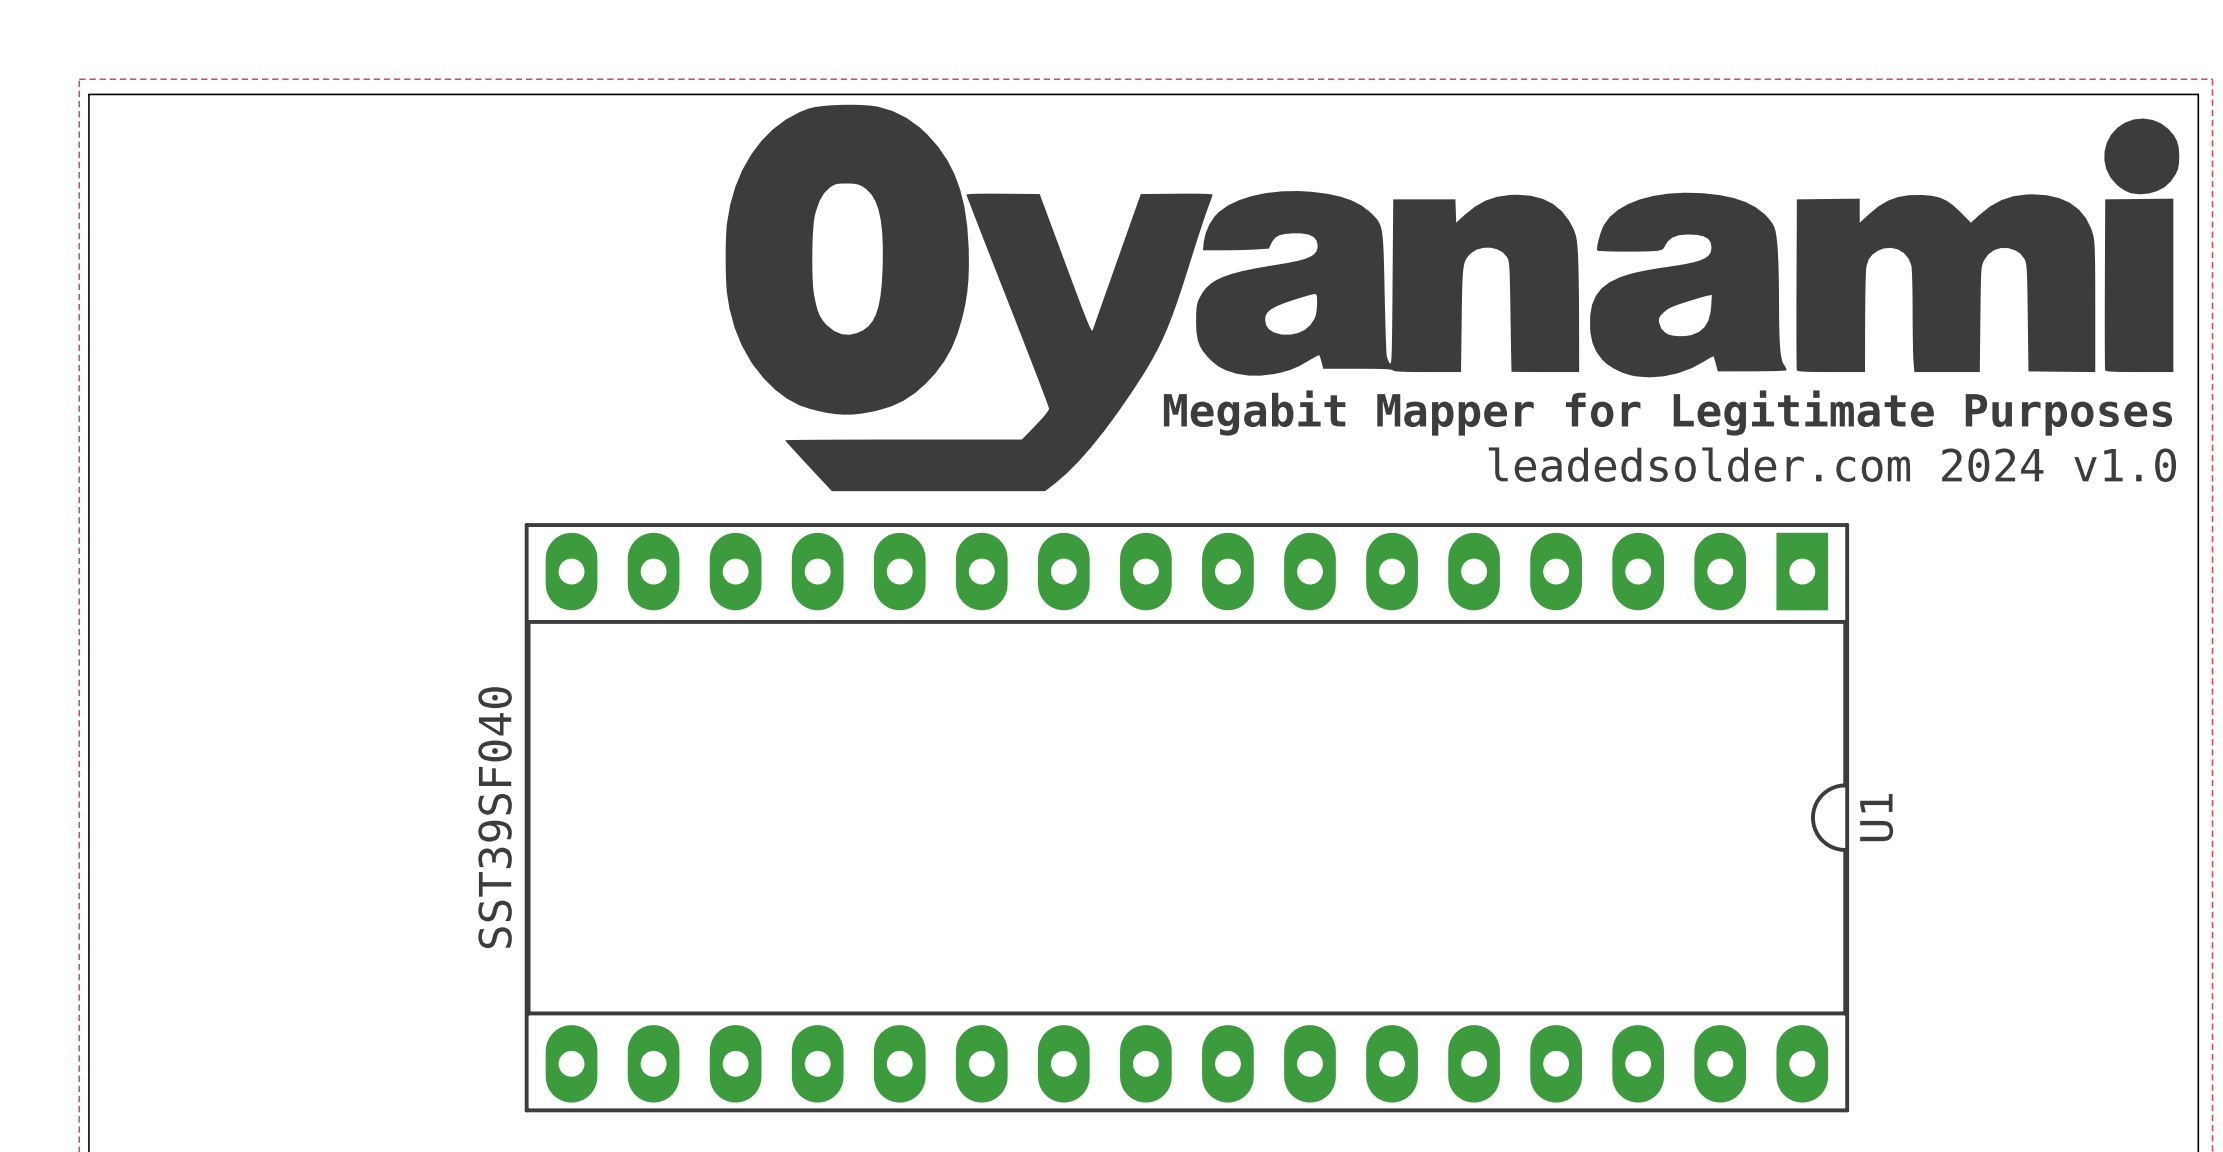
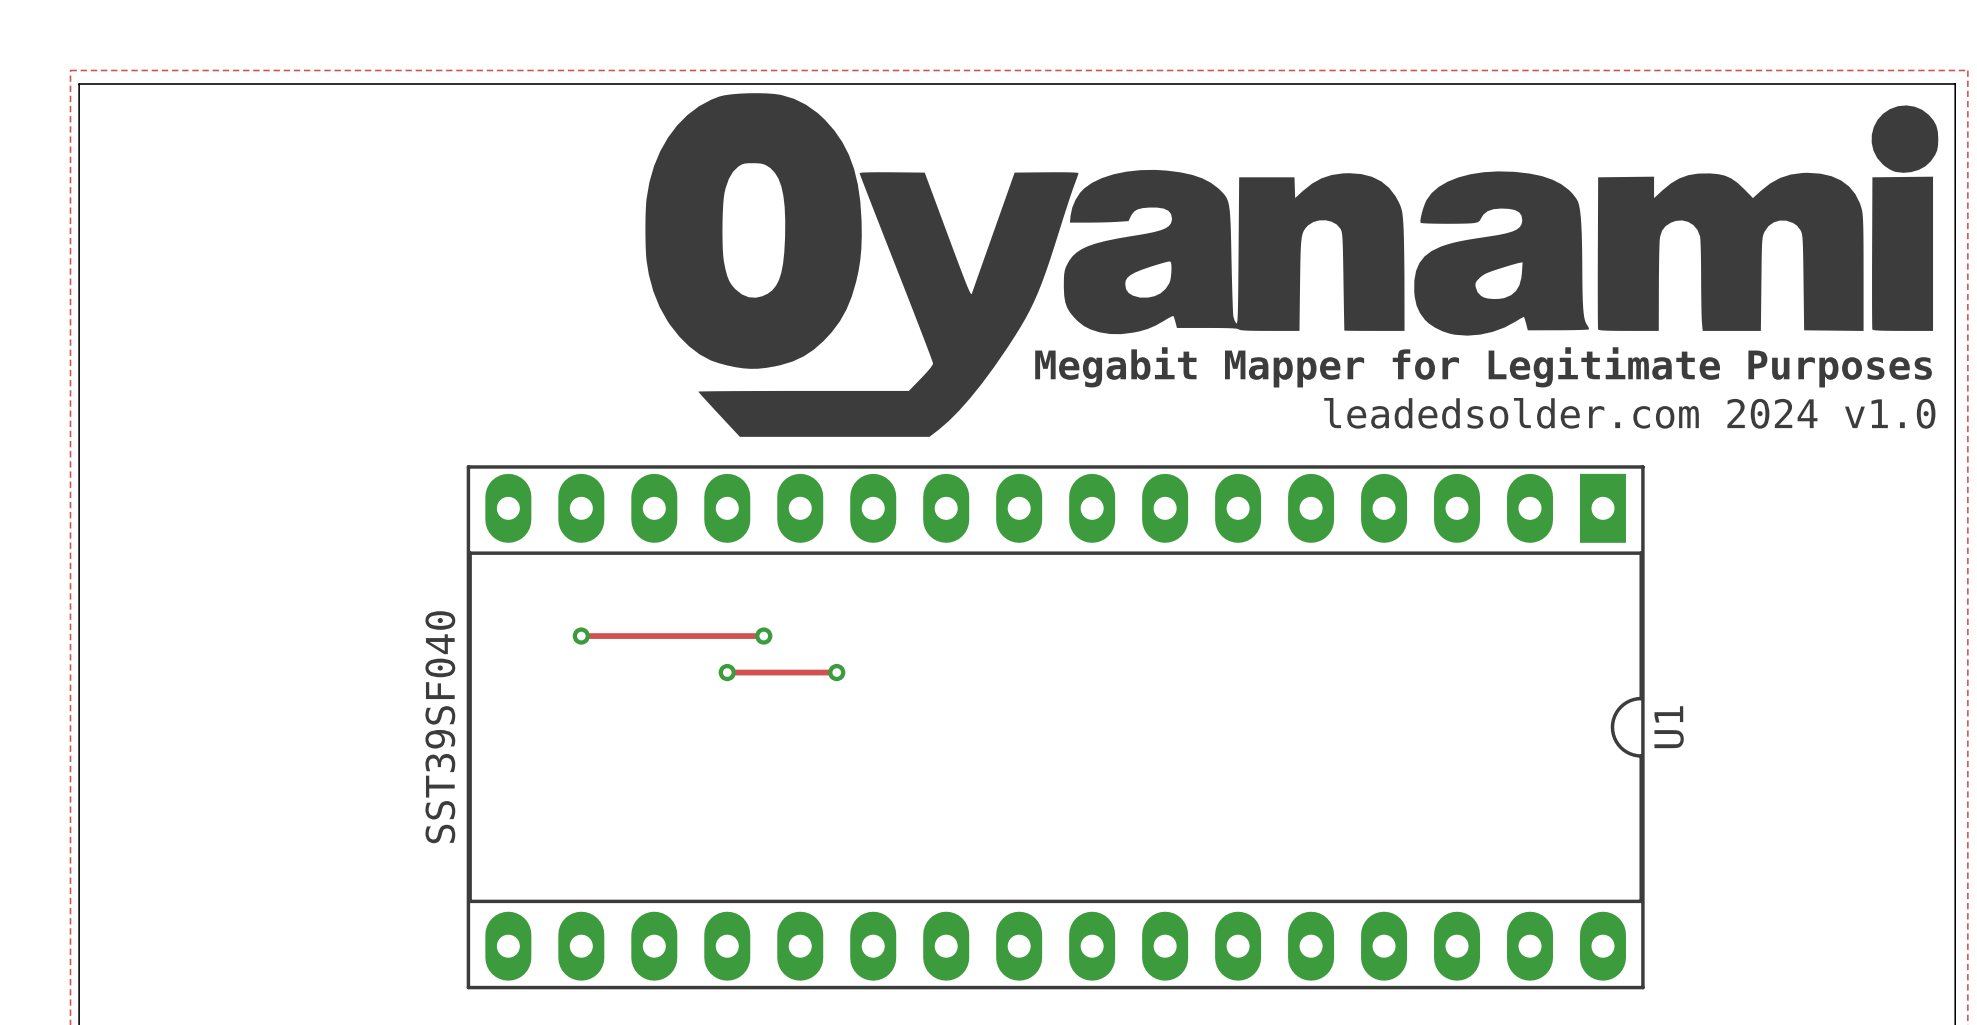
track: none -> (581, 636) (763, 636)
via: none -> (581, 636)
via: none -> (763, 636)
track: none -> (727, 672) (836, 672)
via: none -> (727, 672)
via: none -> (836, 672)

